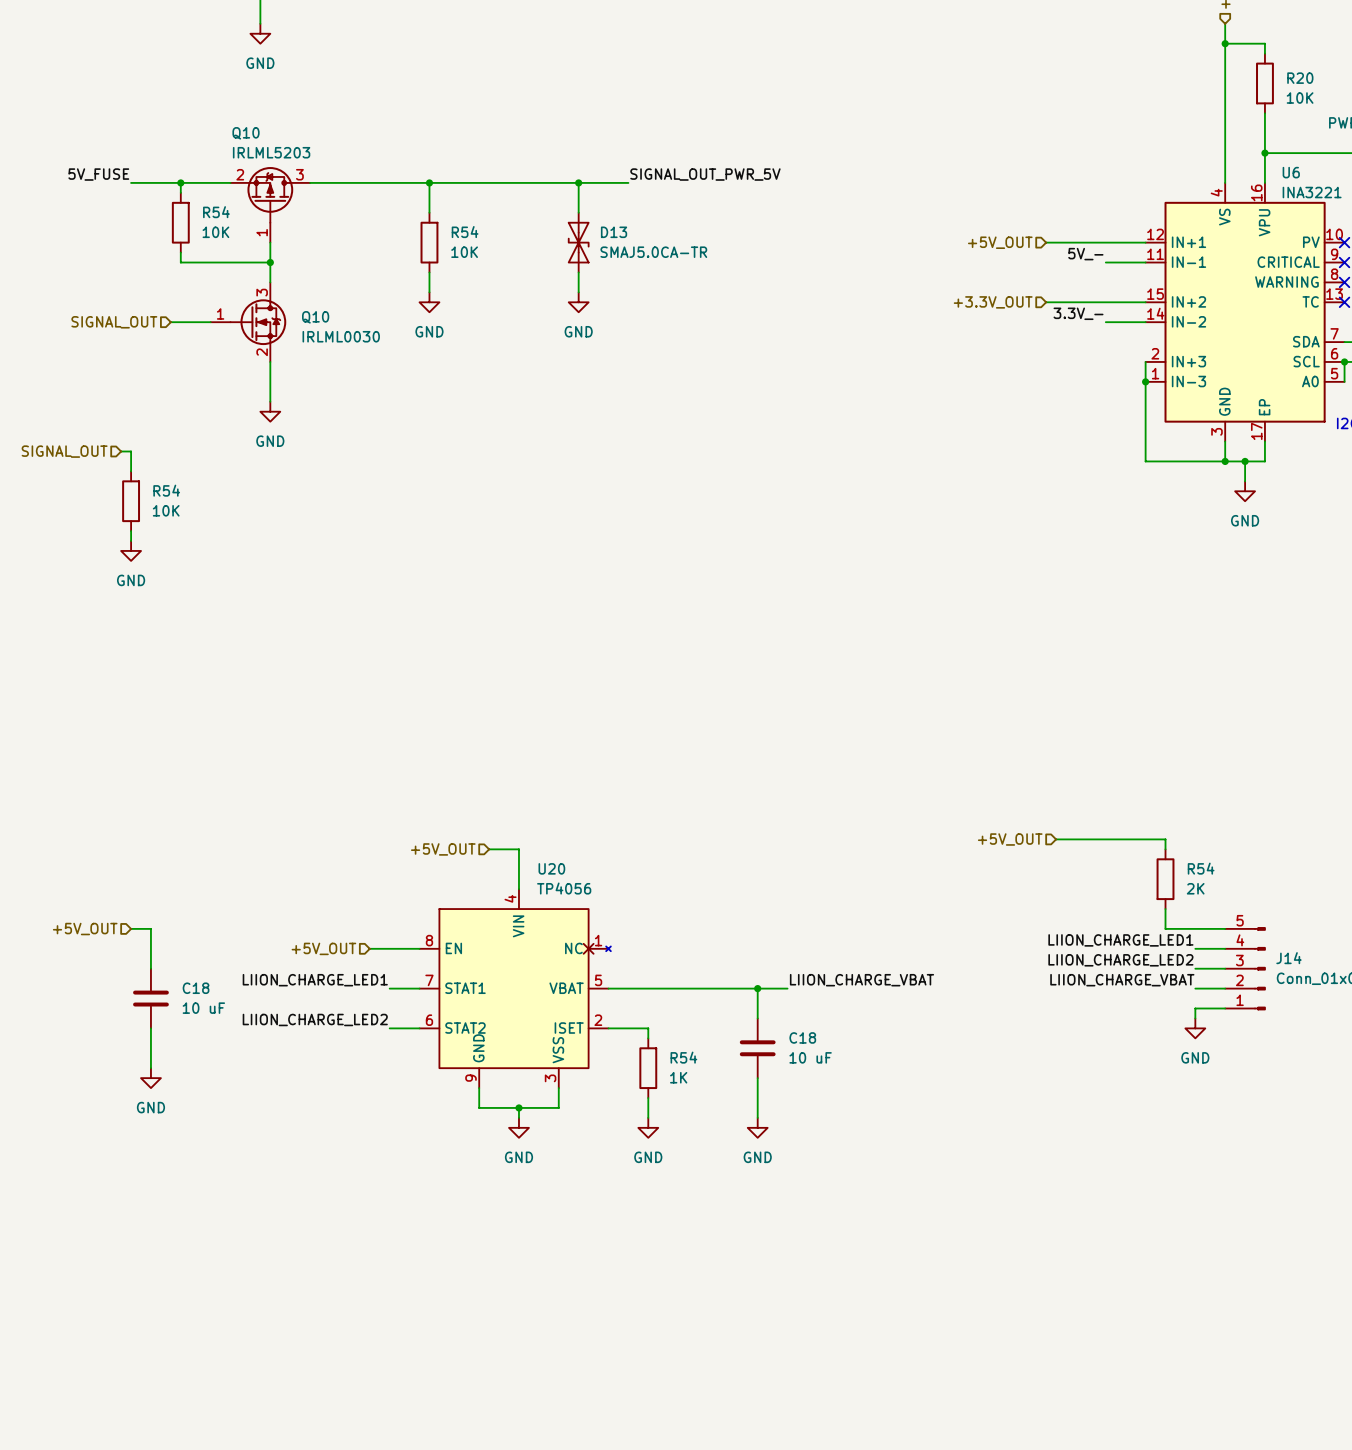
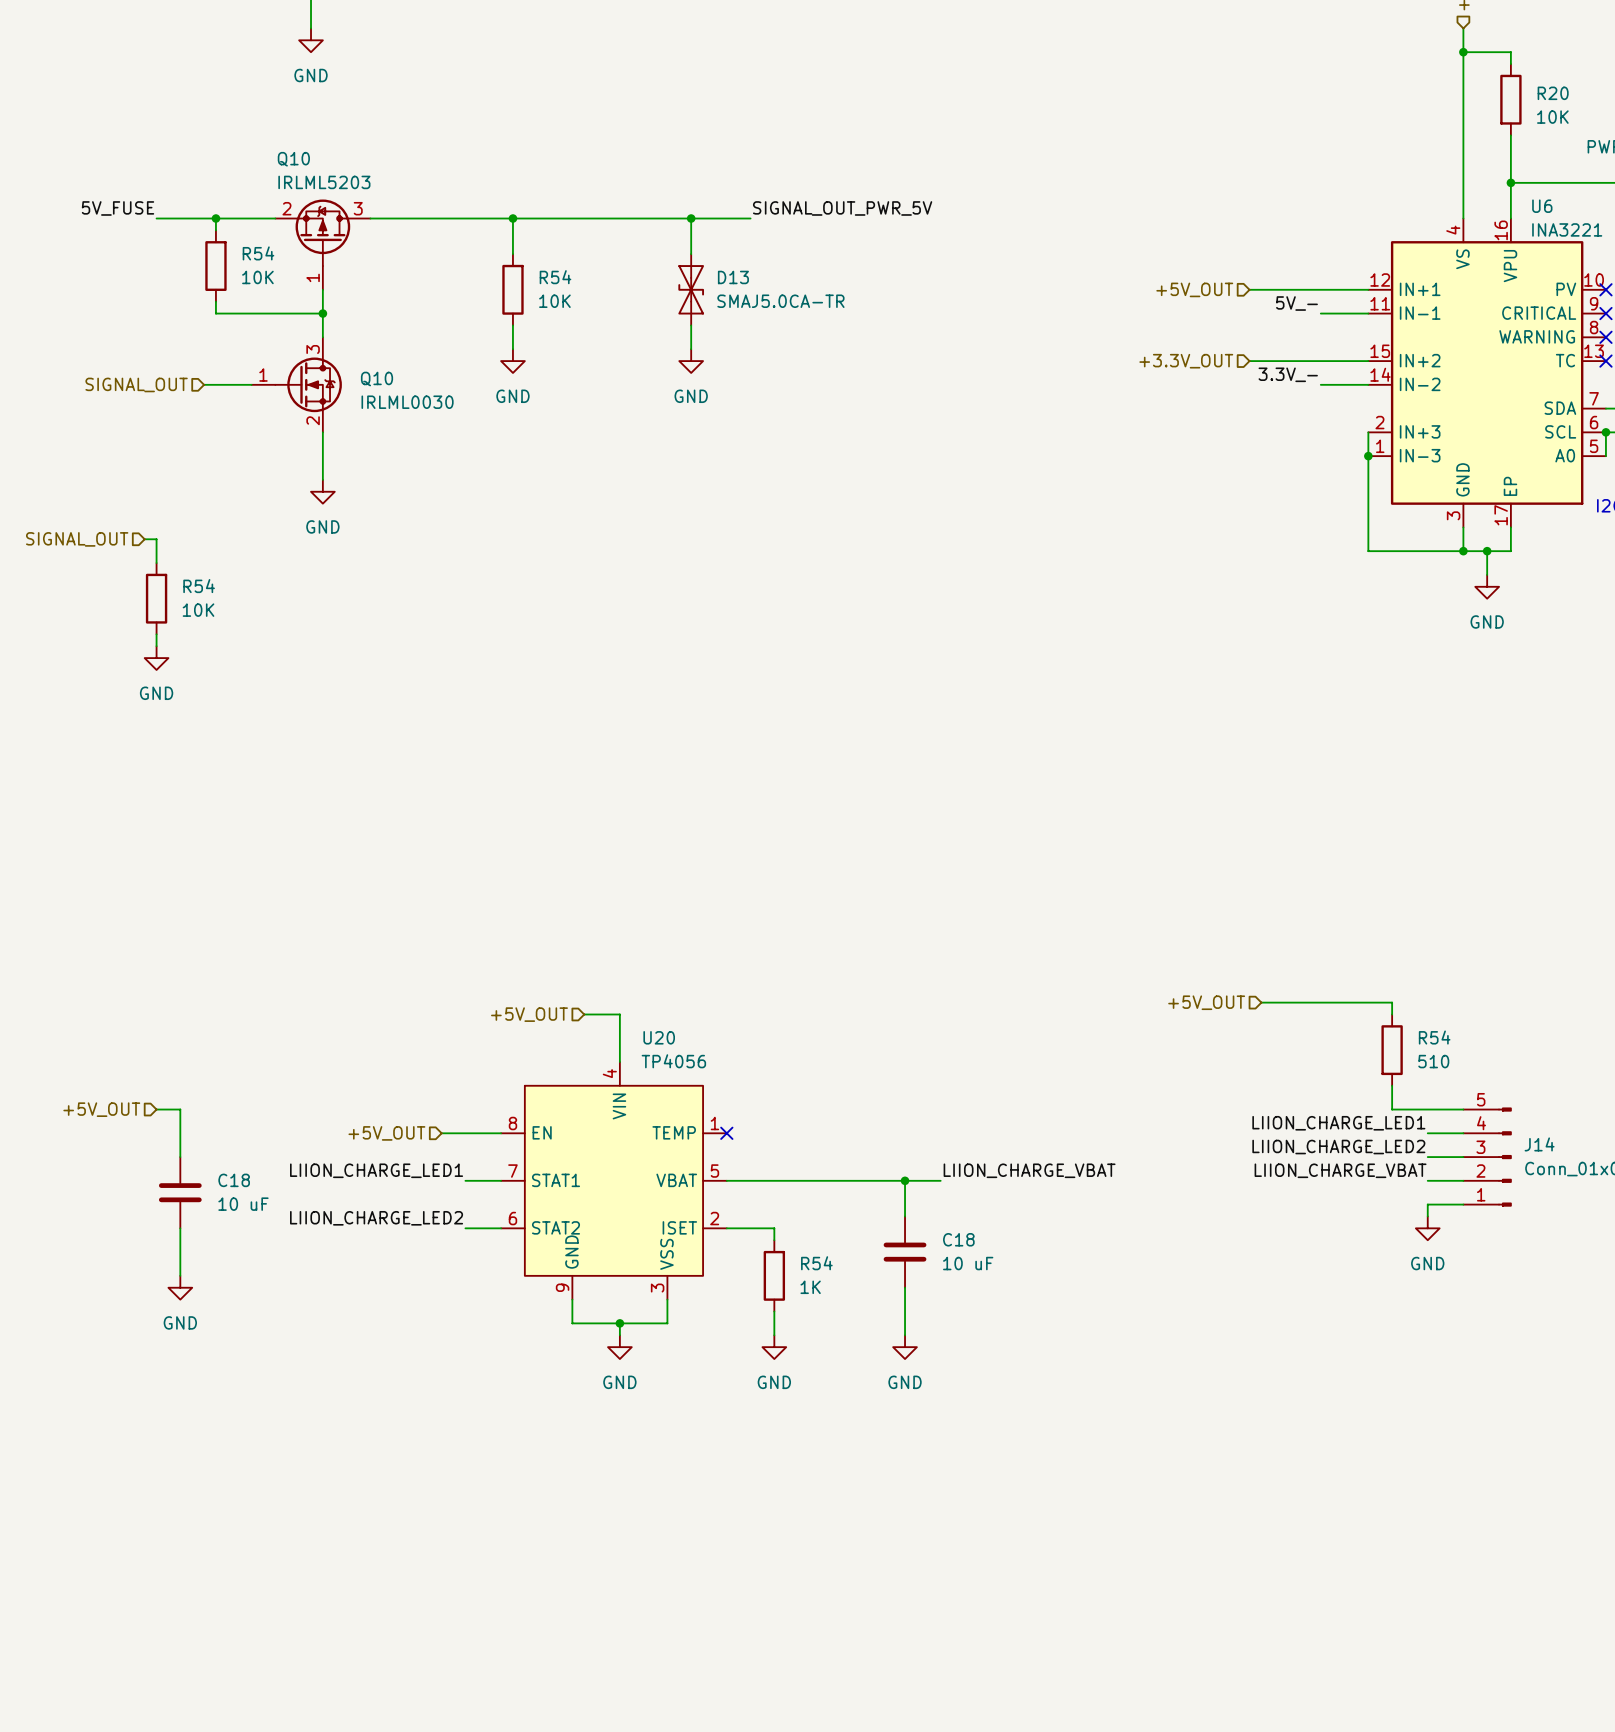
R54 value: 2K (1195, 888) -> 510 (1433, 1061)
U20 symbol: [419, 889, 611, 1089] -> [501, 1062, 727, 1300]
no-connect mark: none -> (726, 1133)

